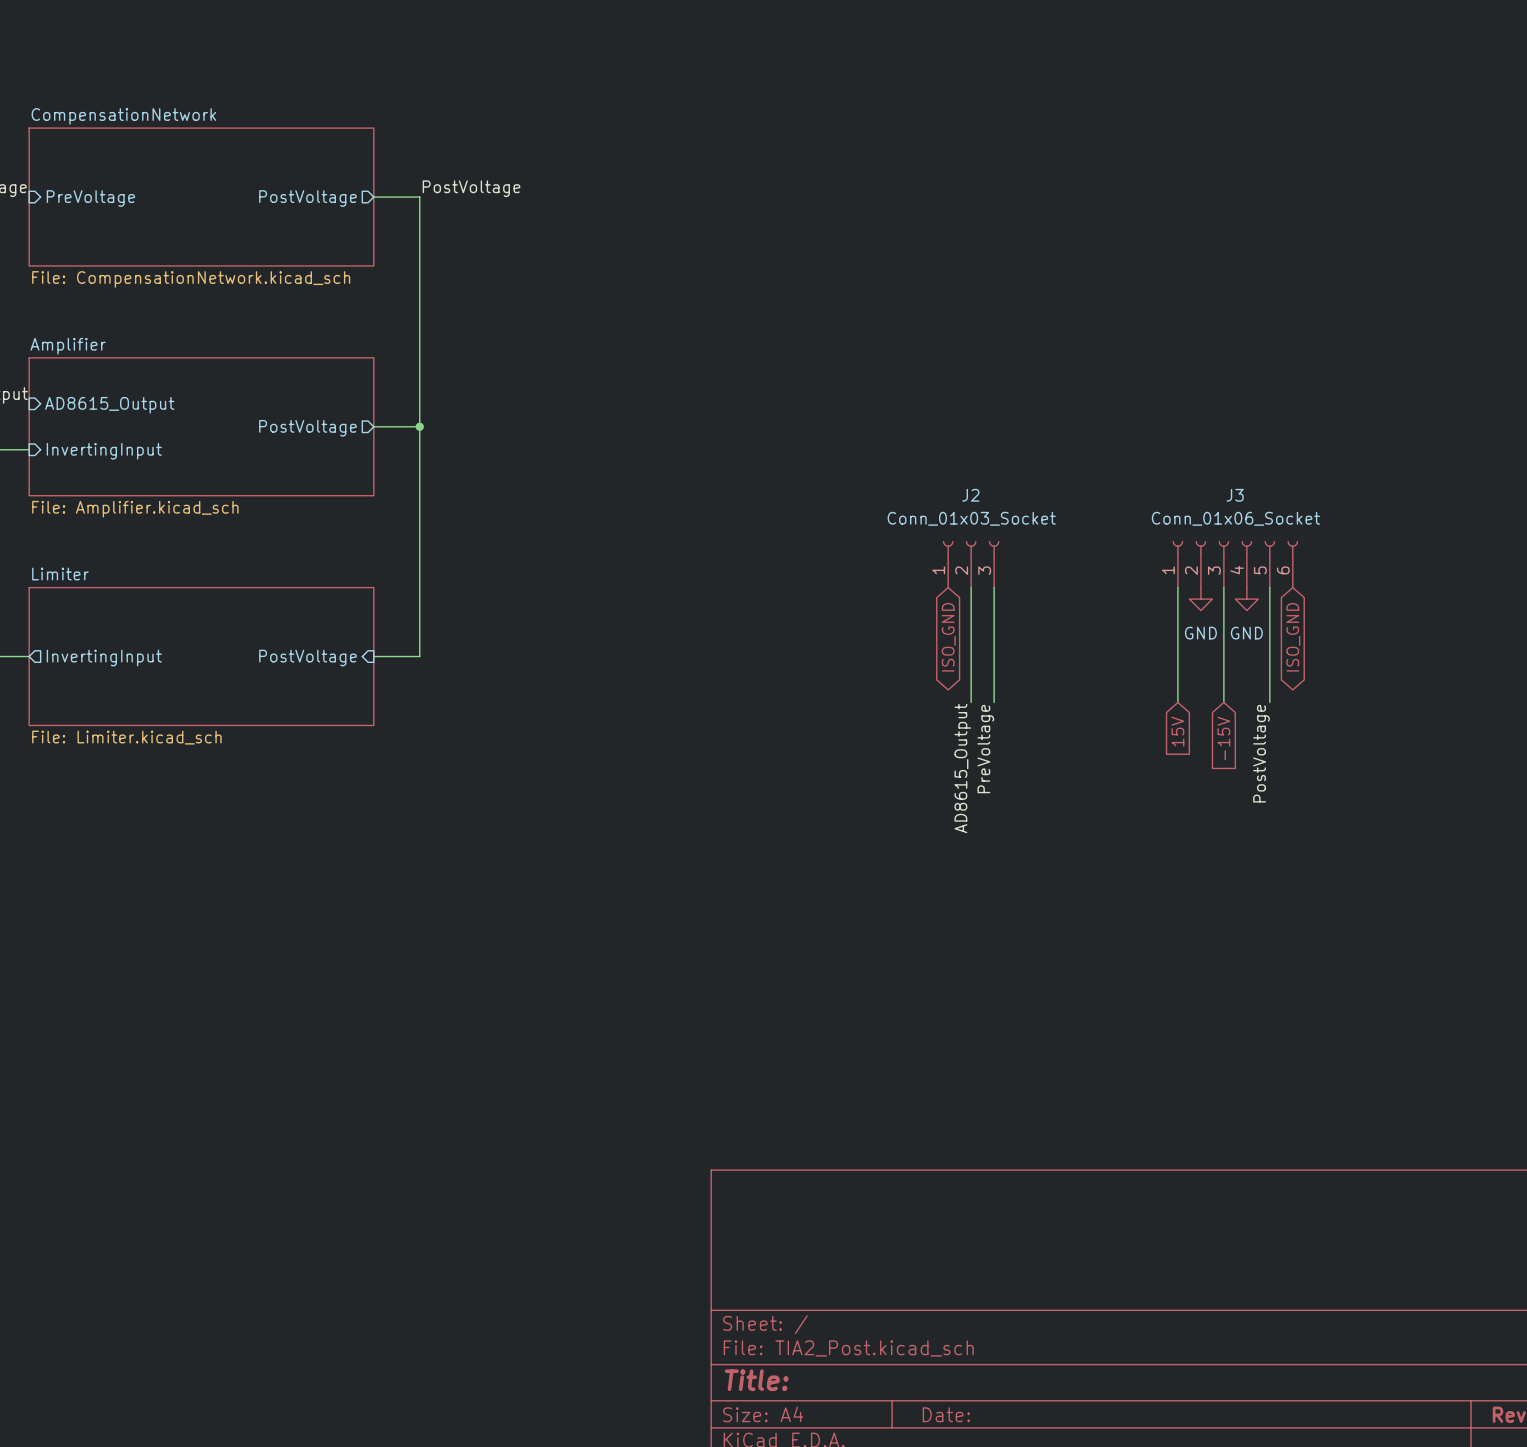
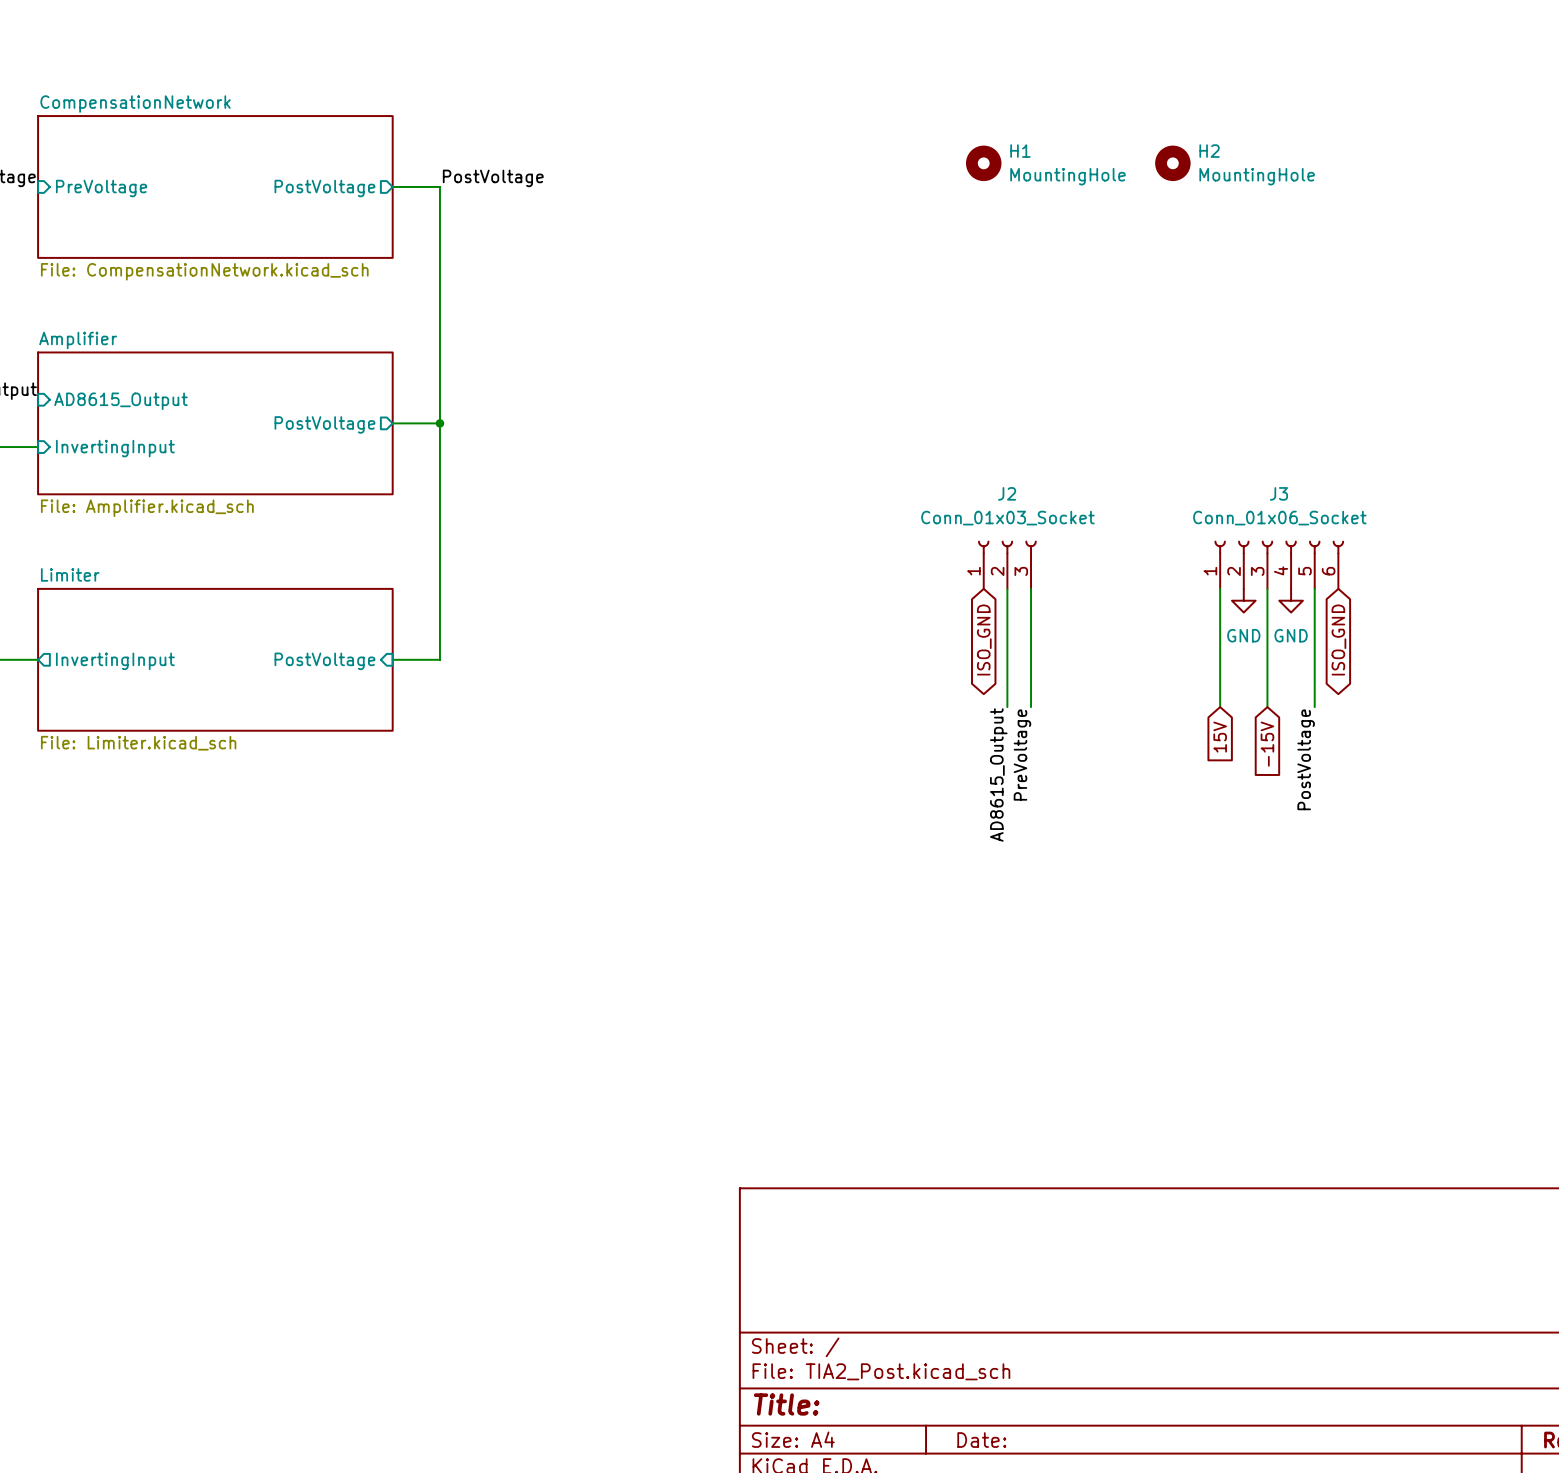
H1: none -> MountingHole (983, 163)
H2: none -> MountingHole (1172, 163)

